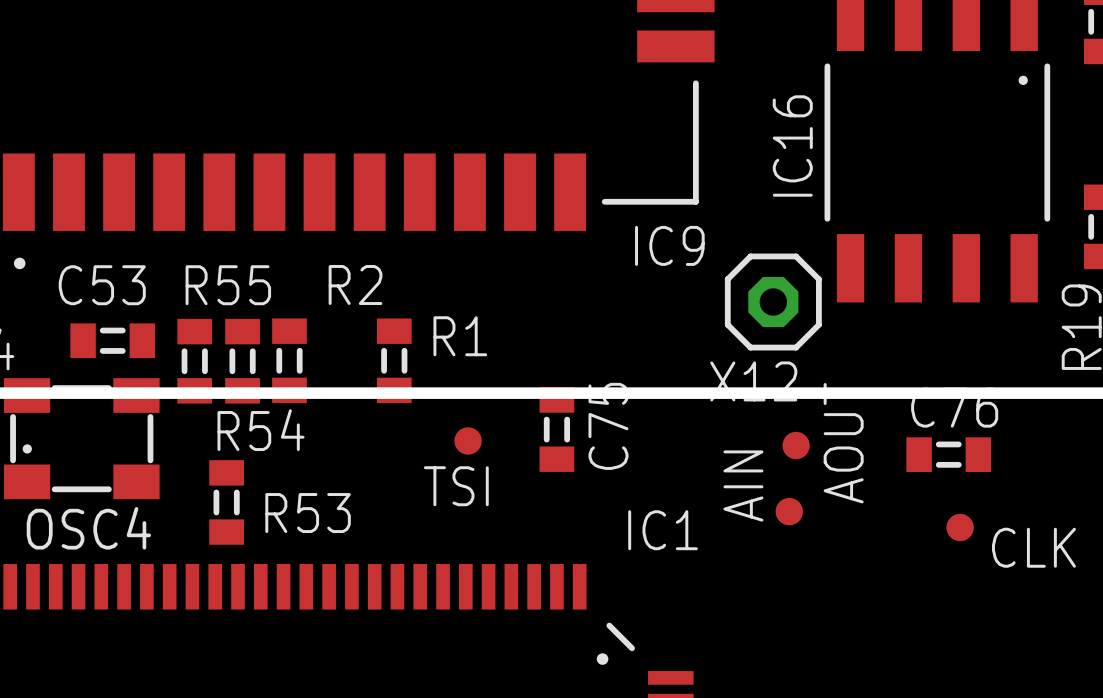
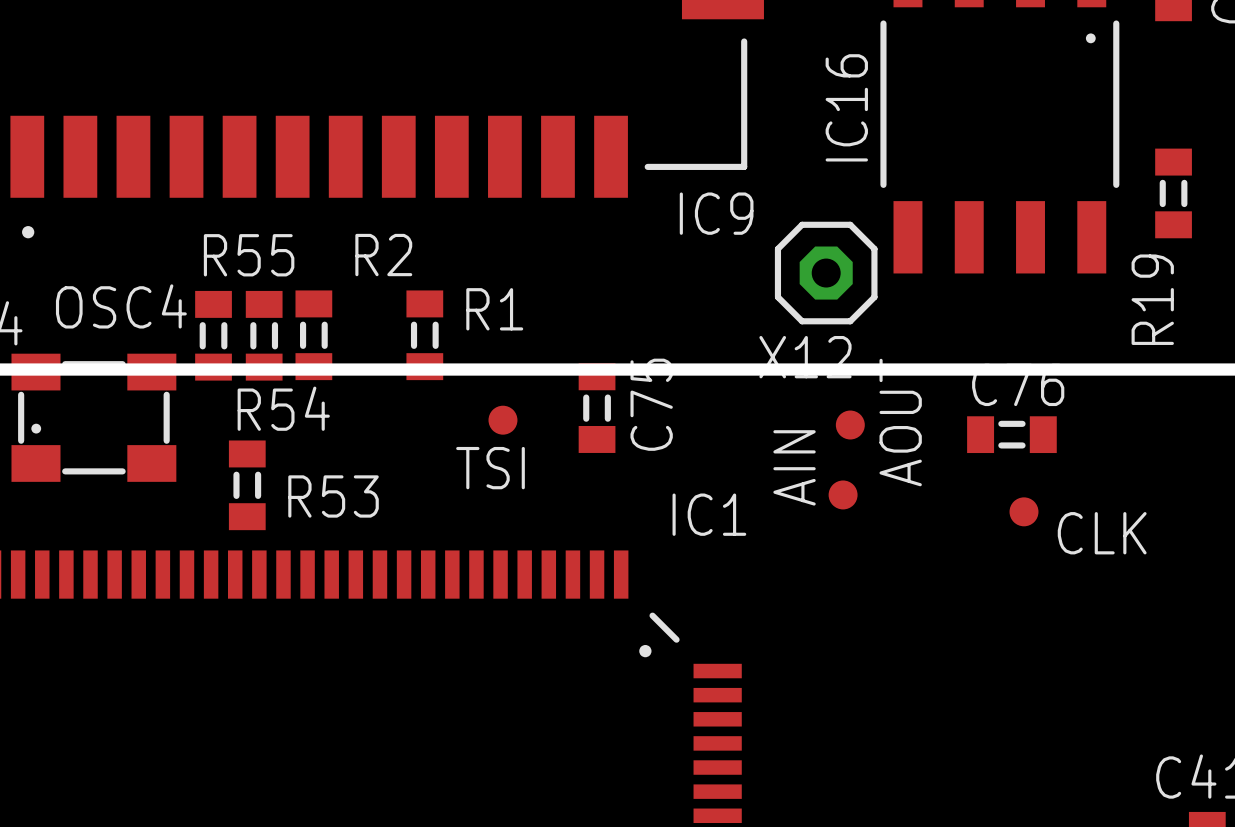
C53: (112, 340) -> none
OSC4 name position: OSC4 (88, 528) -> OSC4 (121, 306)

